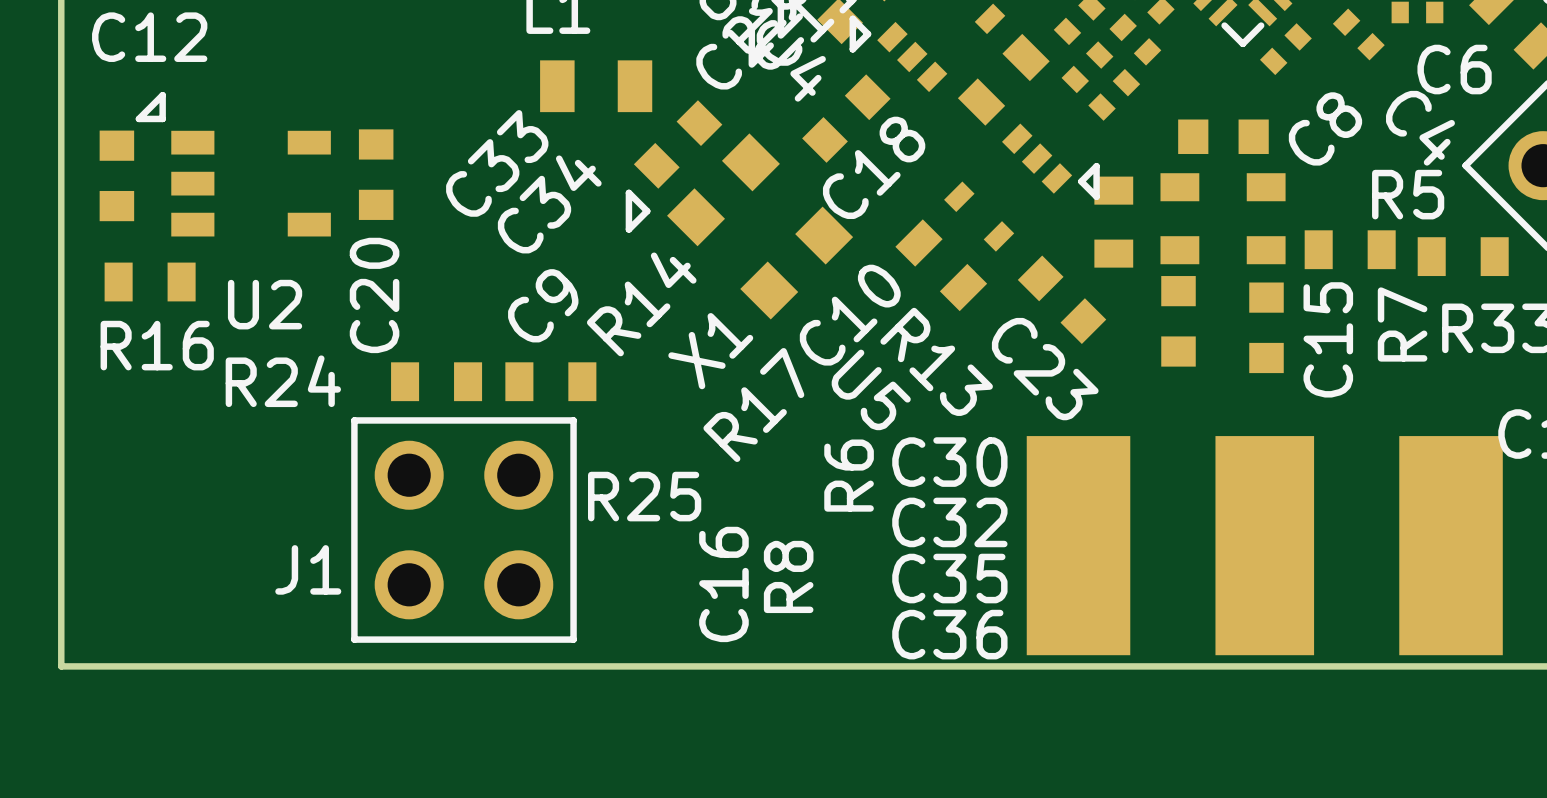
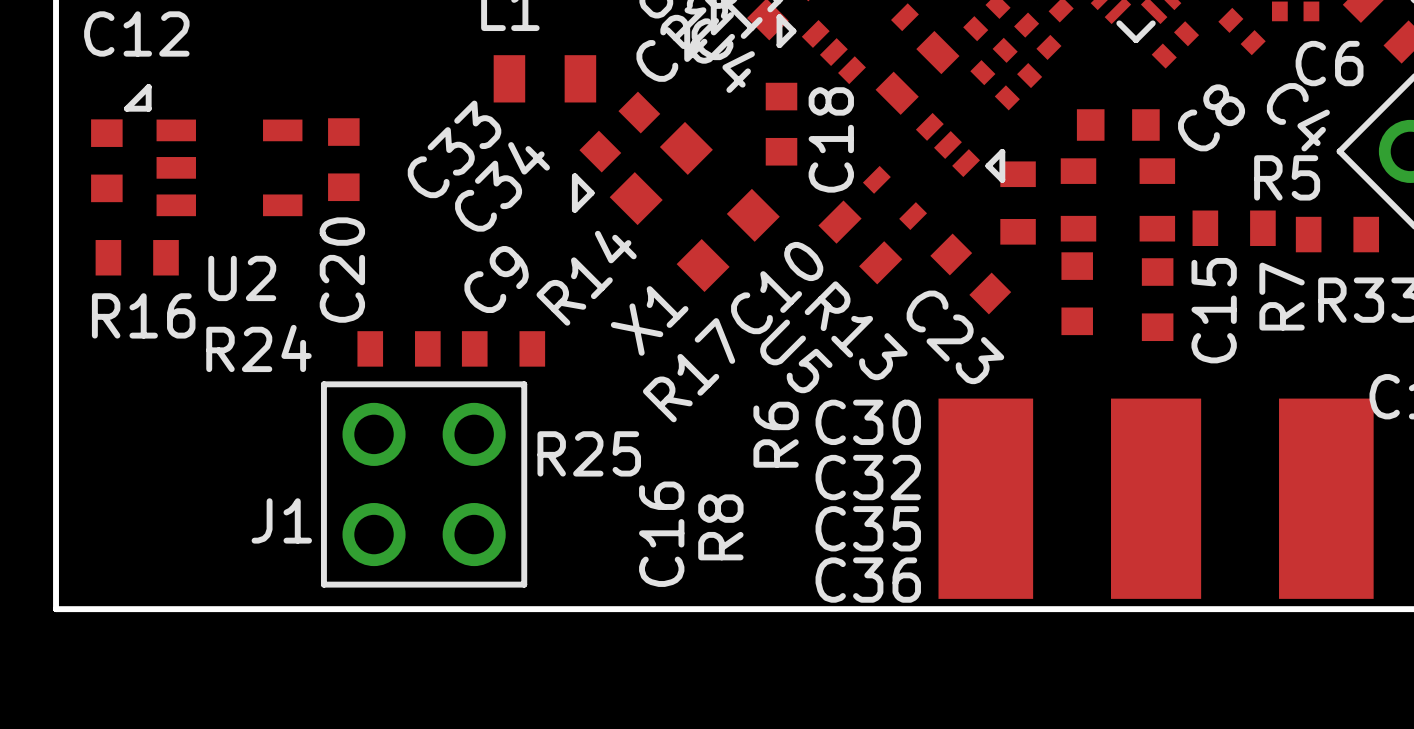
C18 rotation: 0° (846, 118) -> 45° counterclockwise (781, 124)

